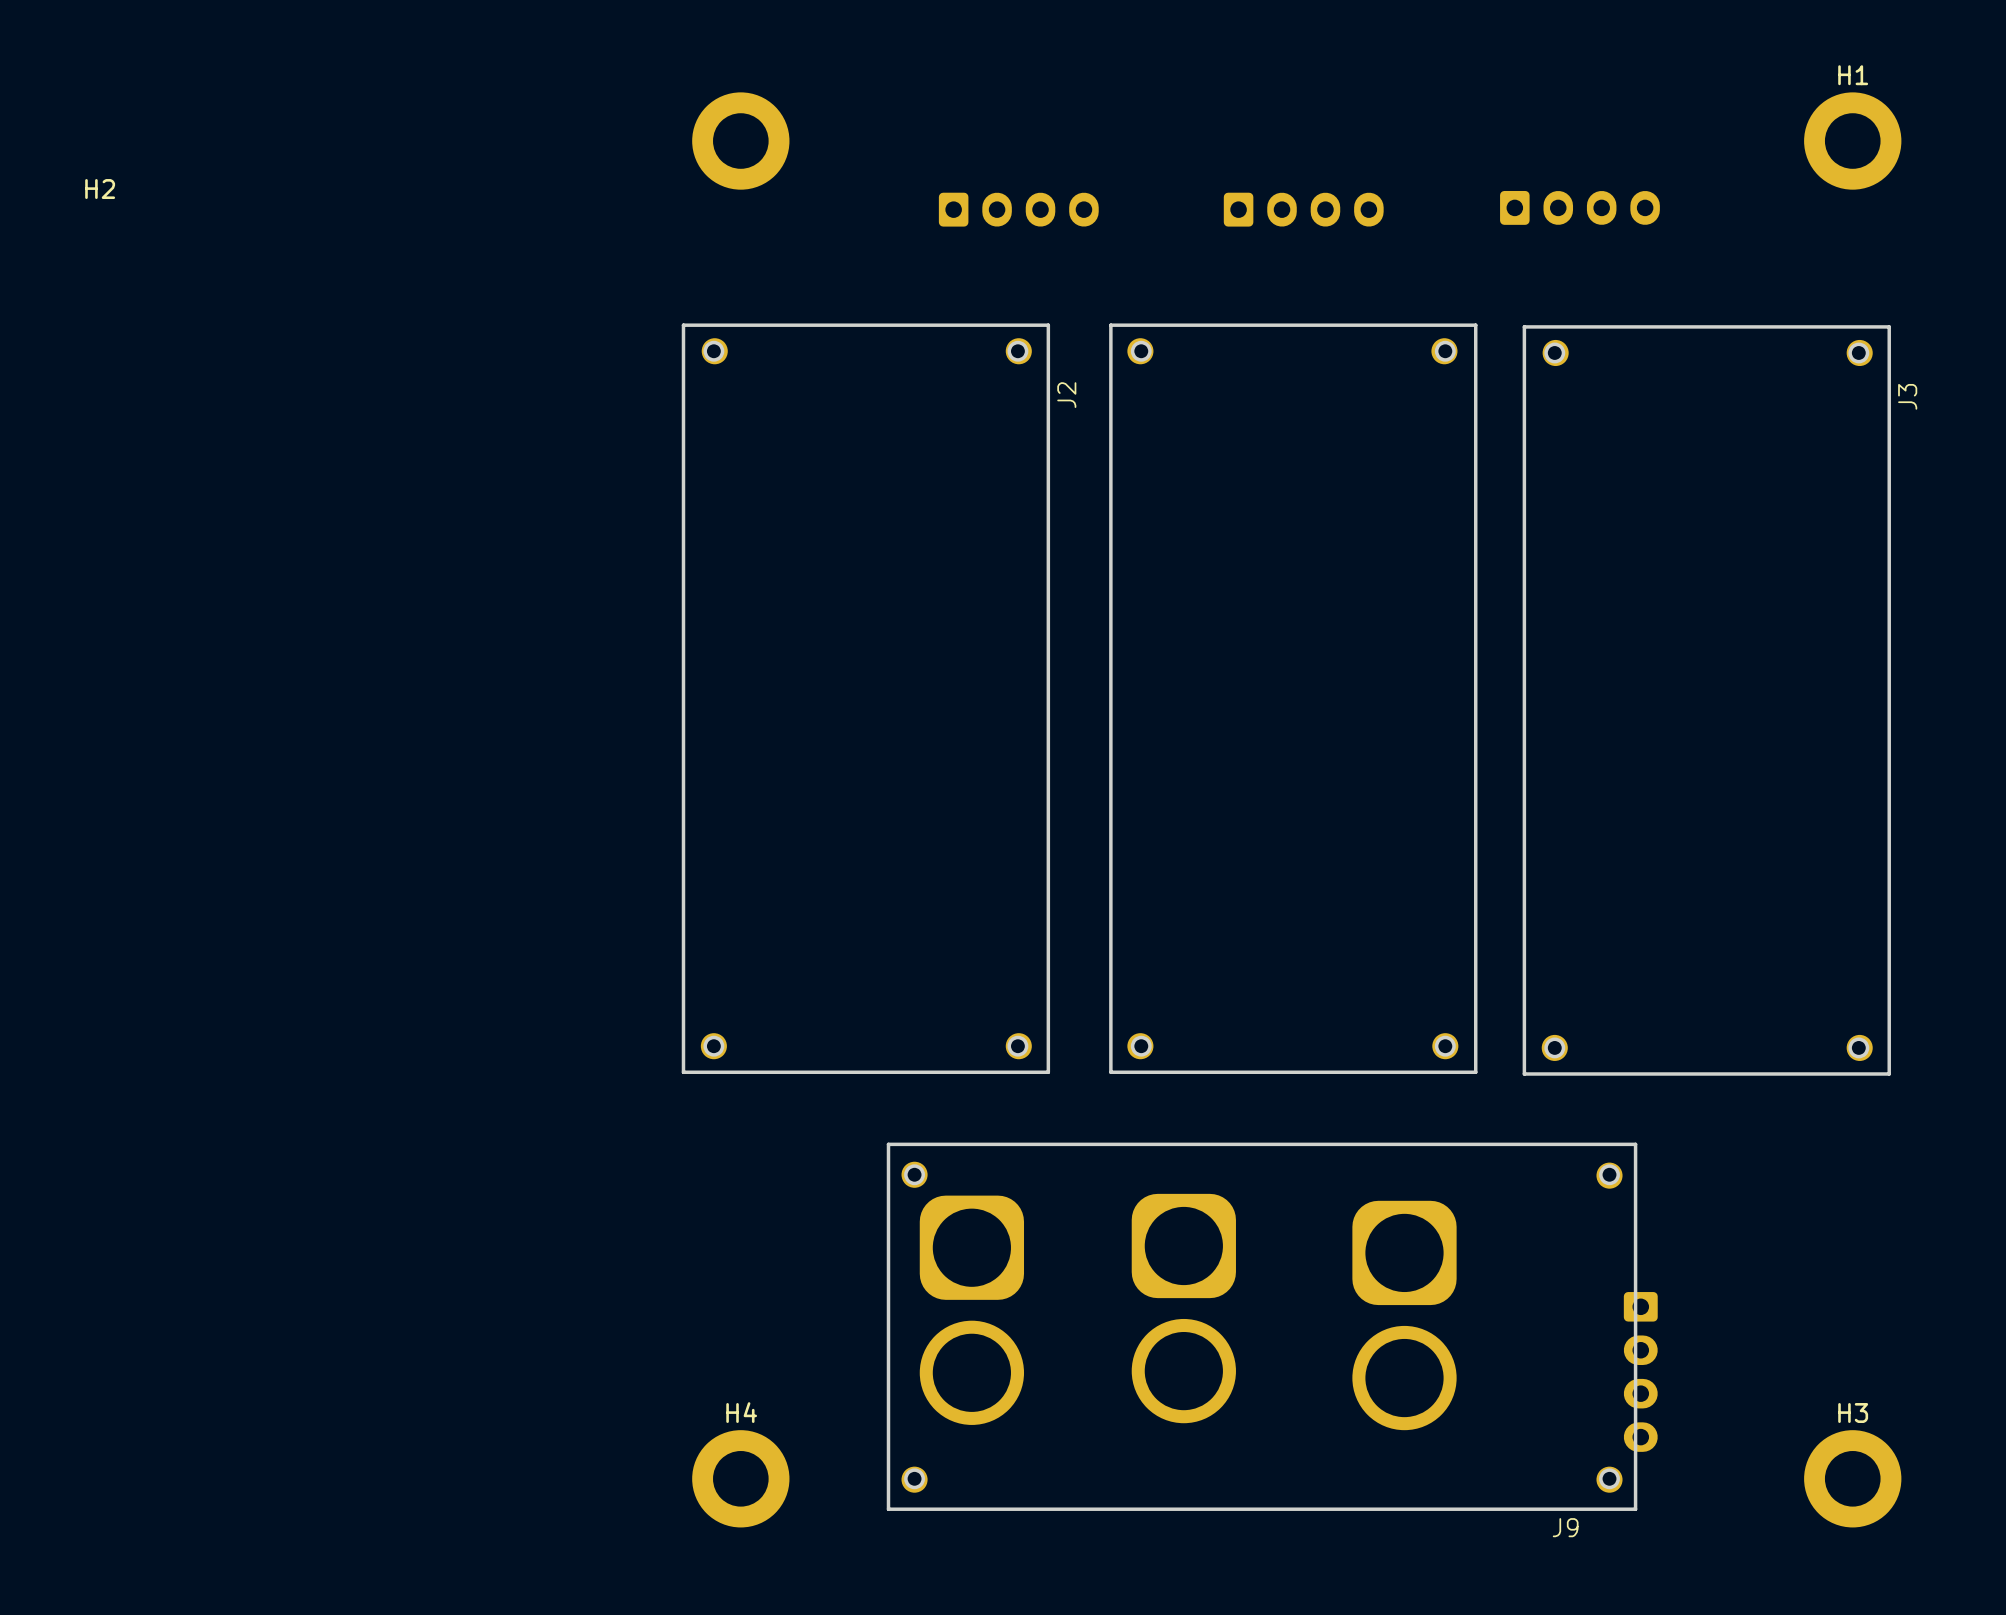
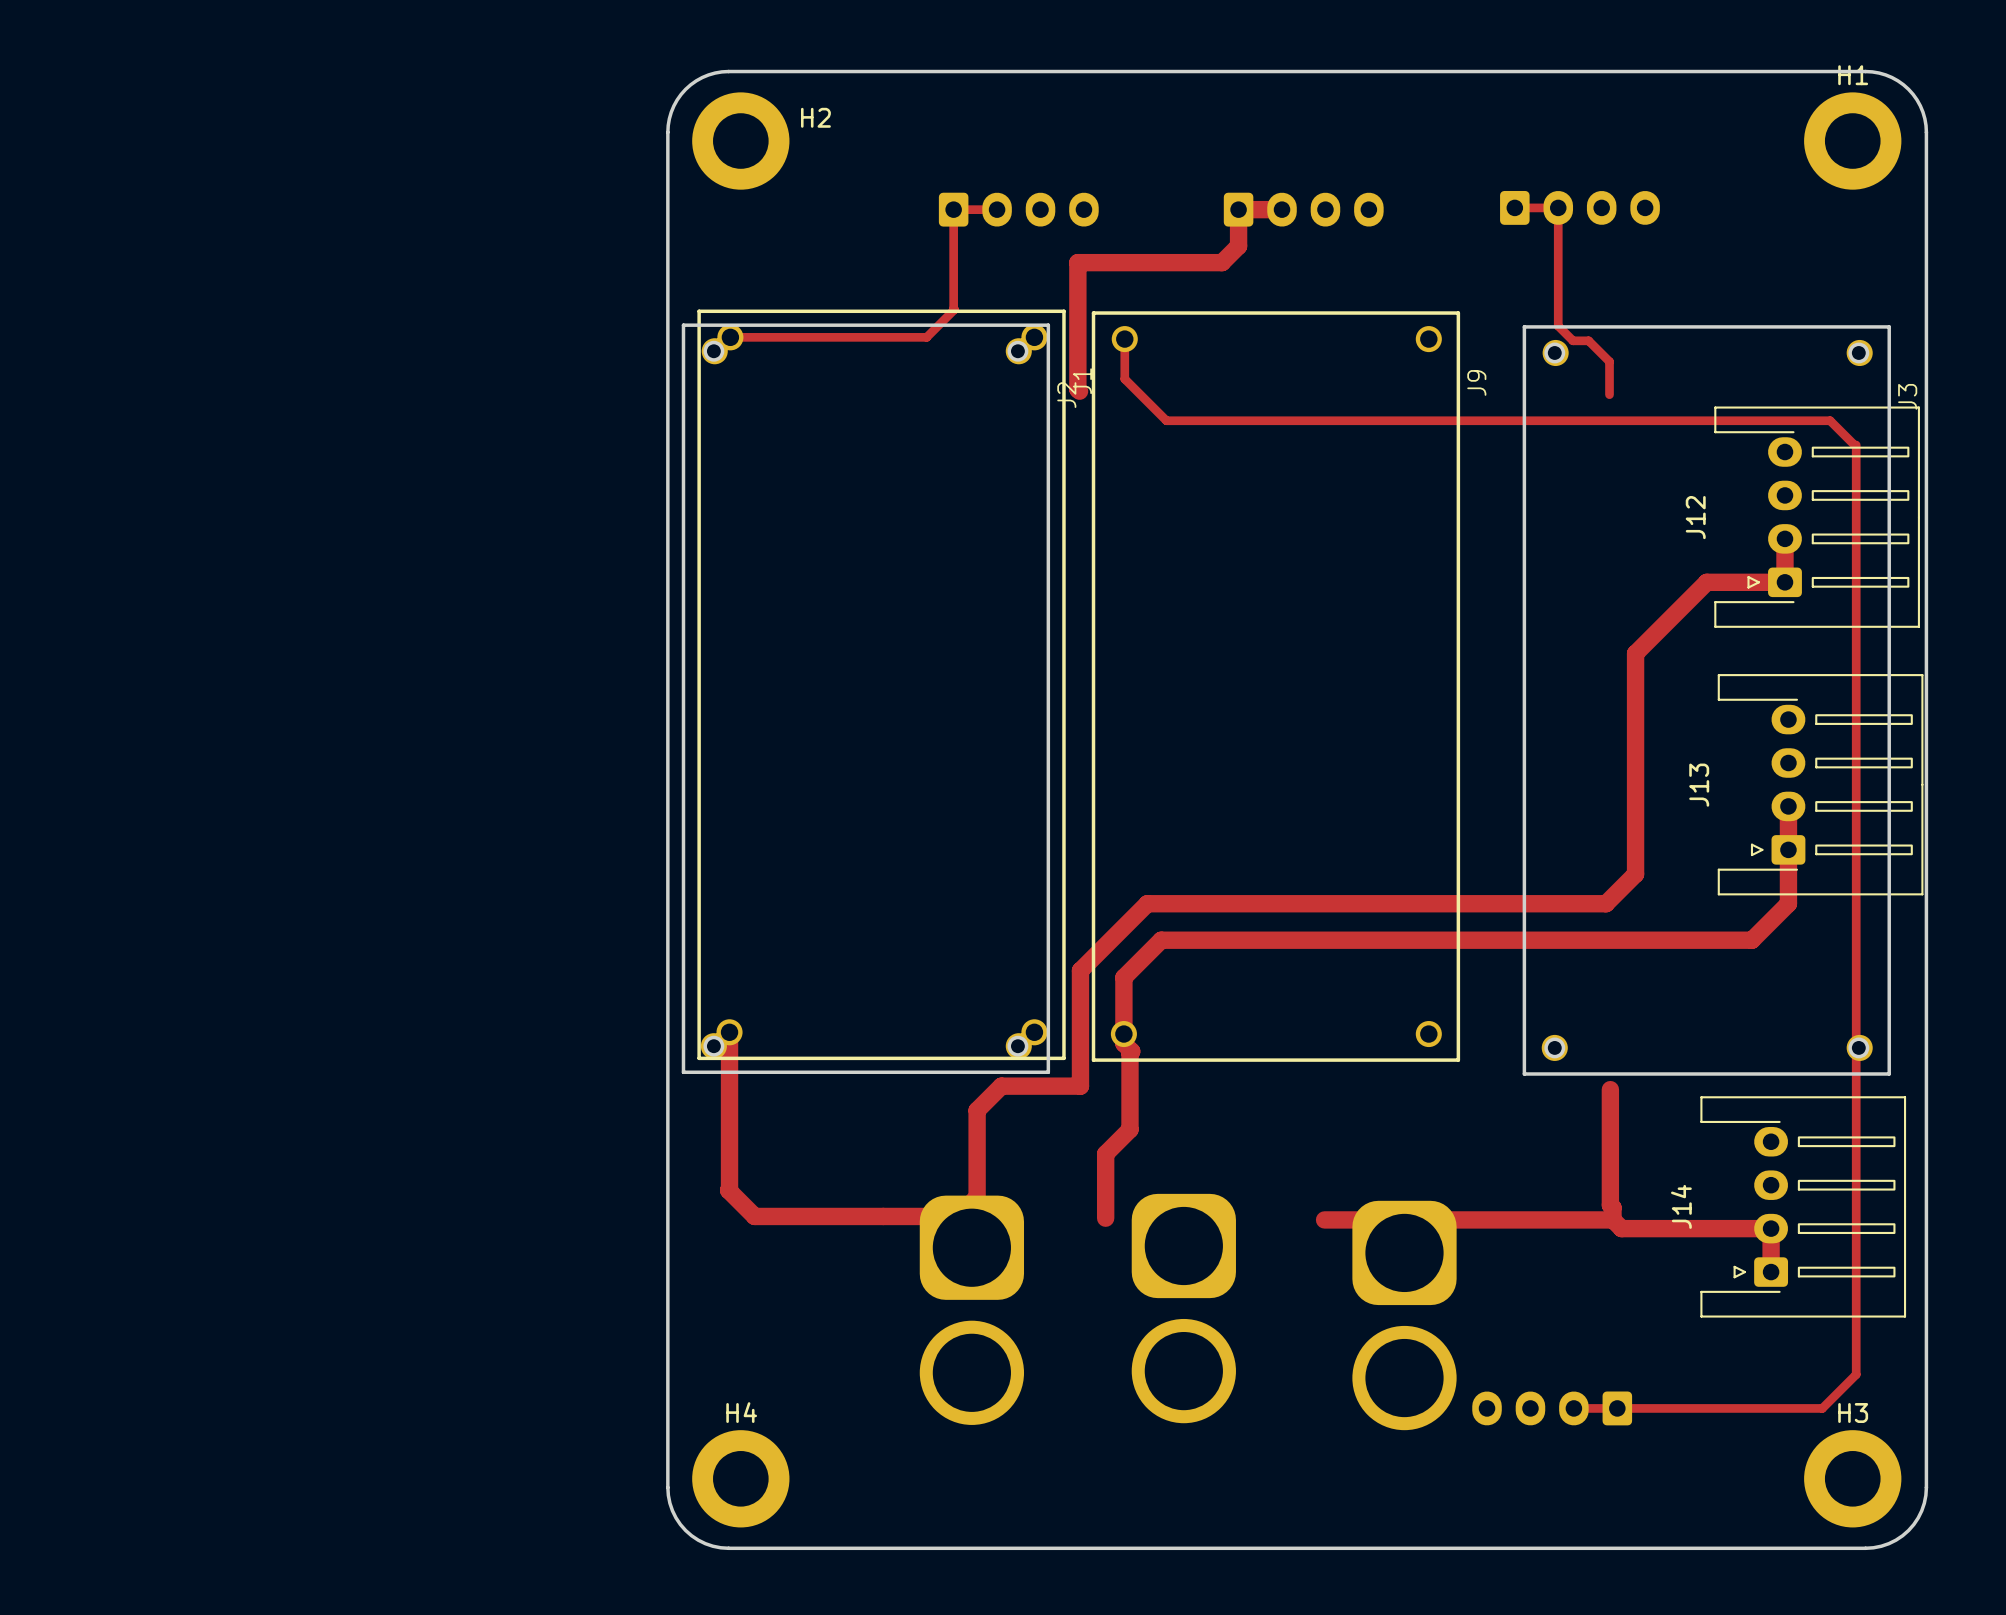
board edge: none -> (728, 71) (1865, 71) (1879, 73) (1891, 77) (1903, 84) (1913, 94) (1922, 112) (1926, 132) (1926, 1487) (1921, 1510) (1913, 1524) (1902, 1535) (1881, 1546) (1865, 1548) (728, 1548) (712, 1546) (698, 1540) (680, 1524) (669, 1503) (667, 1487) (667, 132) (669, 118) (673, 105) (685, 89) (696, 80) (708, 74) (728, 71)
H2 name position: H2 (100, 189) -> H2 (815, 117)
track: none -> (1514, 207) (1558, 207) (1558, 326) (1573, 340) (1588, 340) (1609, 361) (1609, 394)
track: none -> (997, 209) (953, 209) (954, 309) (926, 337) (730, 337)
track: none -> (1282, 209) (1238, 209) (1238, 246) (1222, 262) (1077, 262) (1077, 389) (1079, 391)
track: none -> (1124, 339) (1124, 379) (1166, 420) (1830, 420) (1854, 445)
track: none -> (1856, 445) (1856, 1374) (1822, 1408) (1573, 1408)
J12: none -> (1817, 517)
track: none -> (1784, 538) (1784, 582) (1706, 582) (1635, 653) (1635, 874) (1606, 903) (1147, 903) (1080, 970) (1080, 1086) (1001, 1086) (977, 1110) (977, 1200) (973, 1200) (957, 1216) (754, 1216) (728, 1190) (729, 1032)
J1 side: bottom (1293, 698) -> top (881, 684)
J13: none -> (1820, 784)
track: none -> (1788, 806) (1788, 903) (1751, 940) (1161, 940) (1123, 977) (1123, 1043) (1131, 1051) (1129, 1053) (1129, 1129) (1105, 1153) (1105, 1218)
track: none -> (1610, 1089) (1610, 1205) (1612, 1207) (1612, 1219)
J9 footprint: [886, 1142, 1638, 1511] -> [1091, 311, 1461, 1062]
J14: none -> (1803, 1206)
track: none -> (1324, 1219) (1612, 1219)
track: none -> (1612, 1219) (1621, 1228) (1771, 1228) (1771, 1272)
part rotation: 0° (1640, 1371) -> 90° clockwise (1552, 1408)
J9 name position: J9 (1565, 1527) -> J9 (1476, 382)

